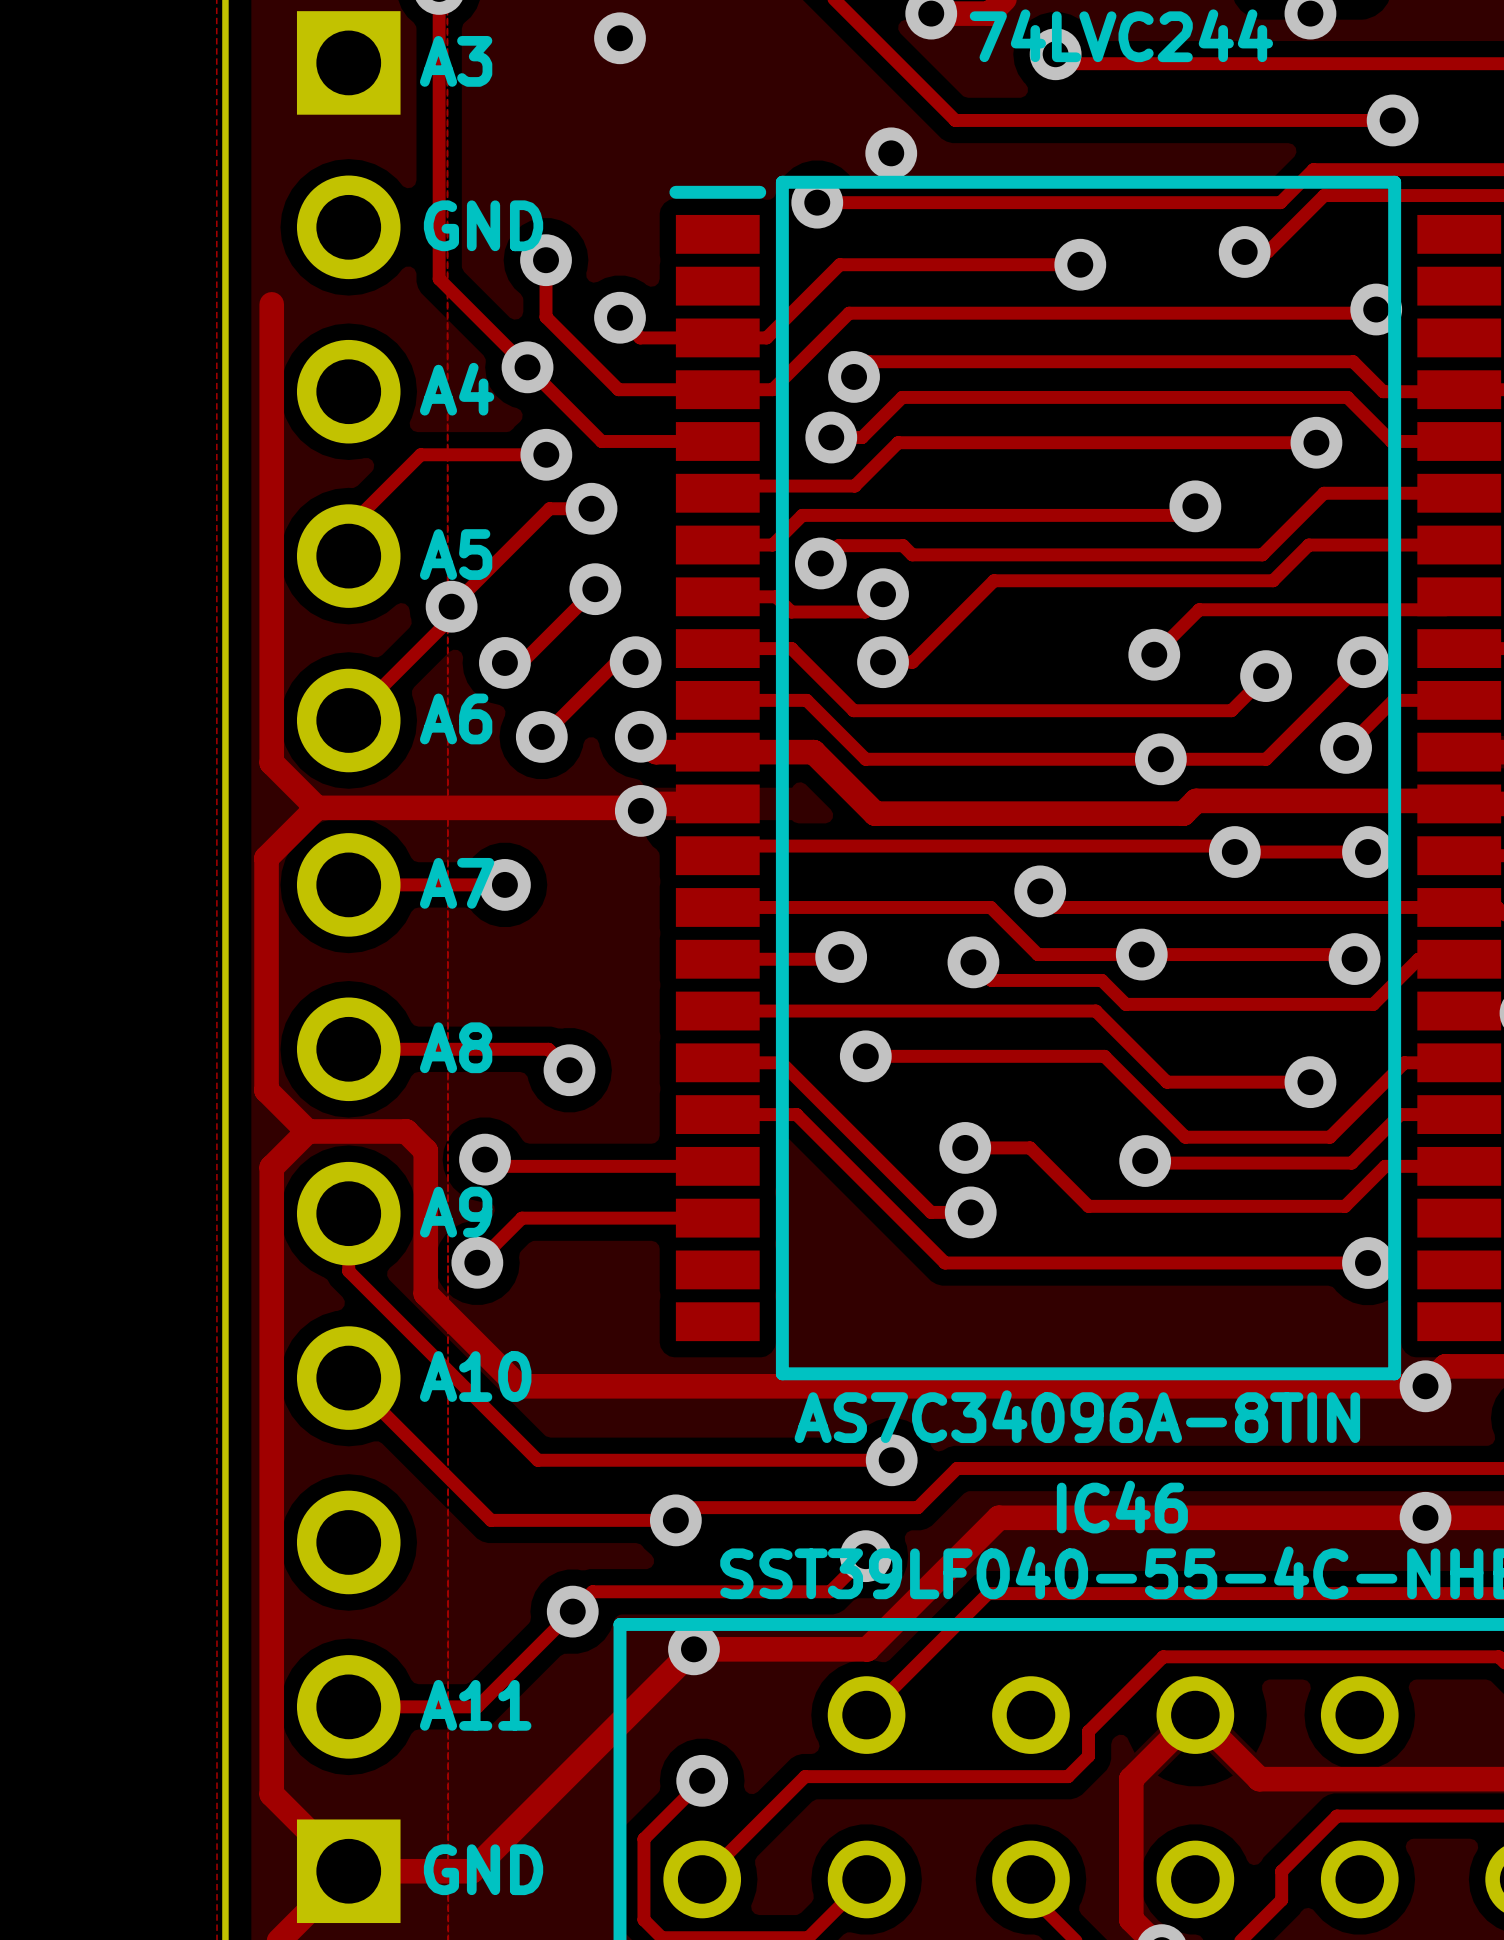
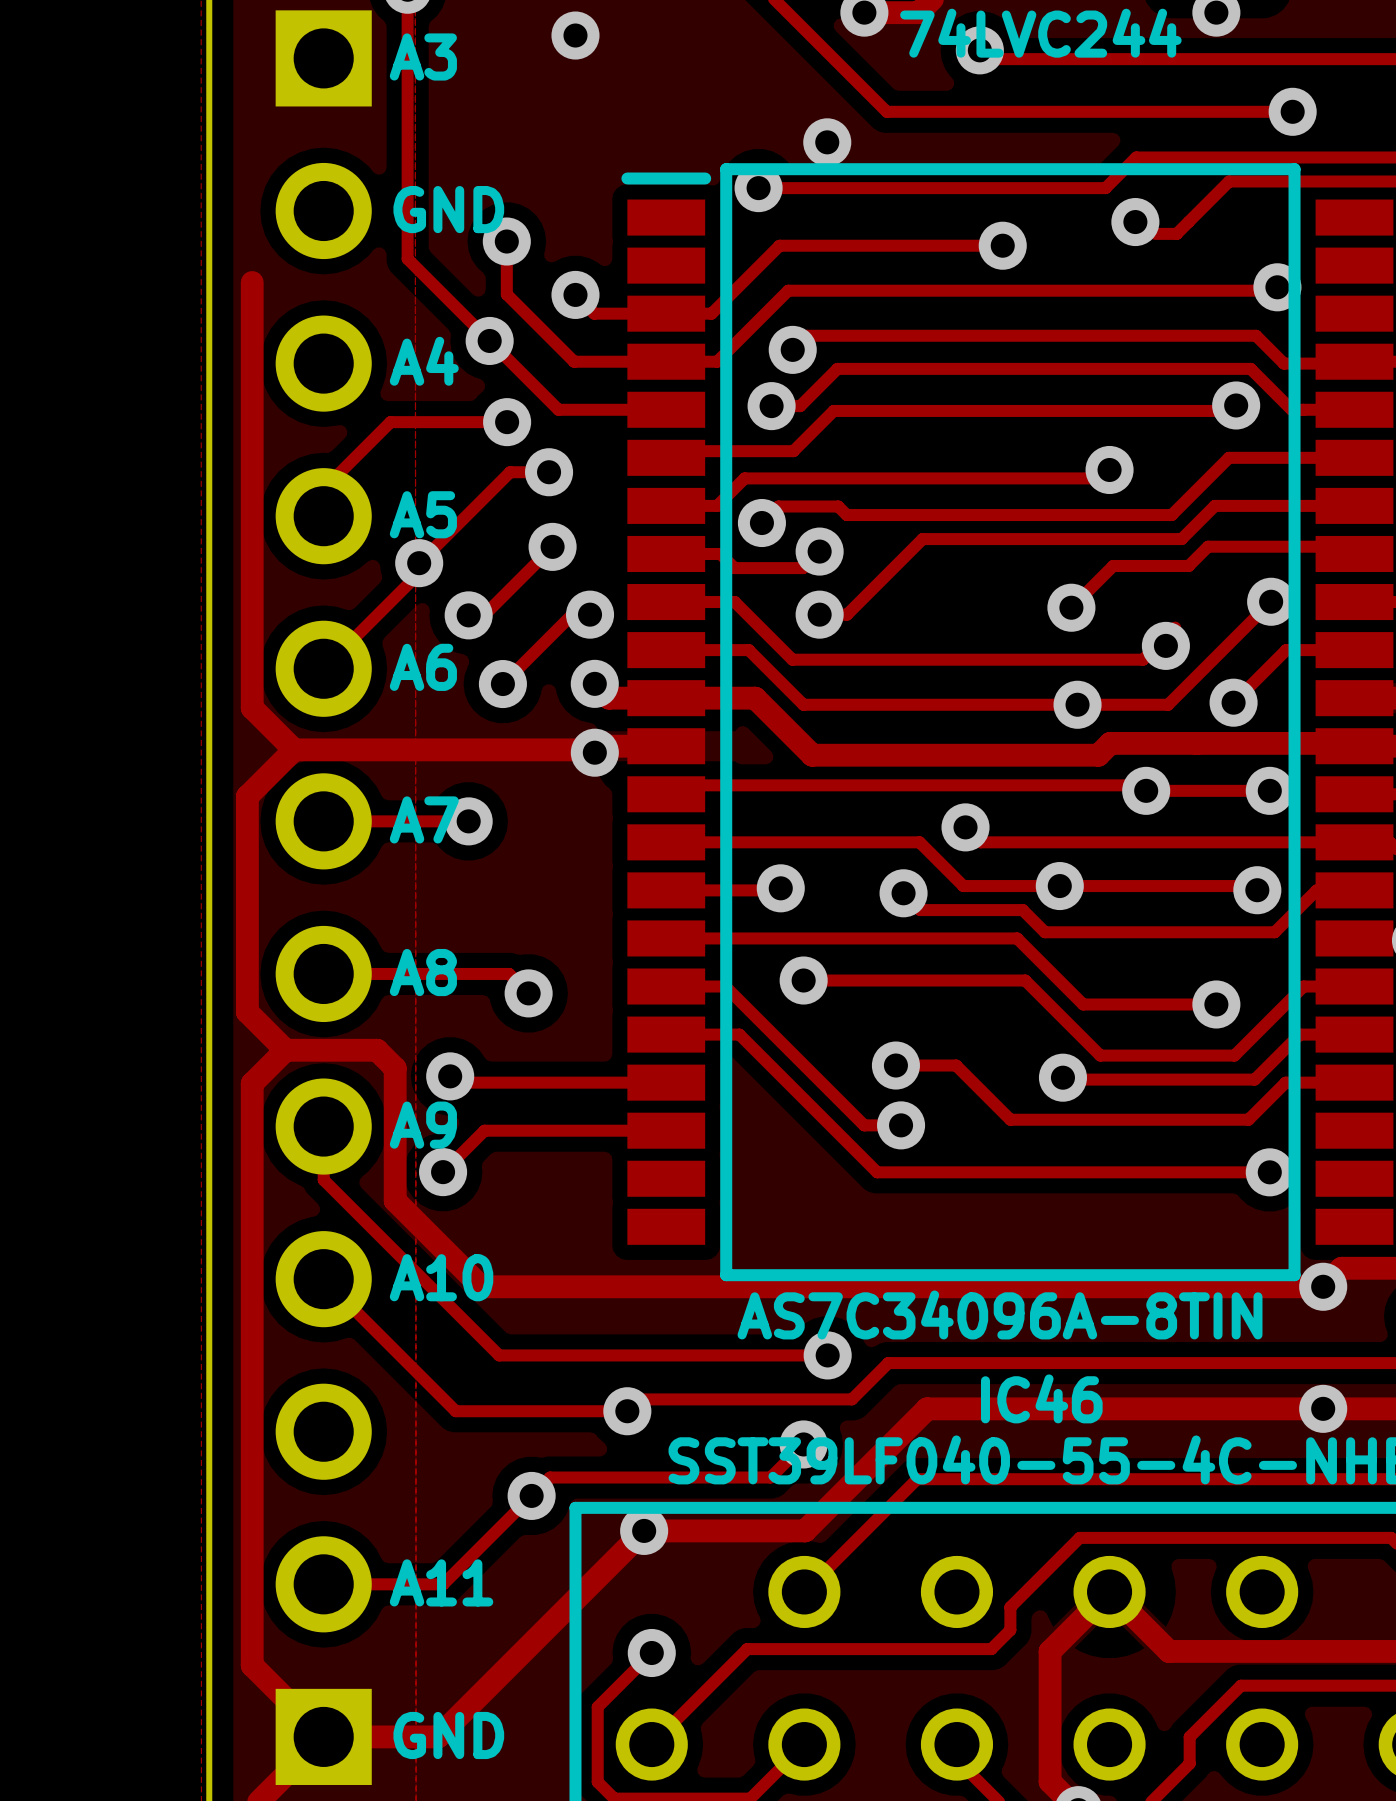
track: (1313, 169) (1280, 202) (1191, 202) -> (1219, 157) (1136, 157) (1105, 188)
via position: (1244, 251) -> (1135, 222)
via position: (1316, 442) -> (1236, 405)
track: (1280, 609) (1446, 609) -> (1188, 565) (1208, 546) (1323, 546)
track: (1363, 662) (1266, 759) (1258, 759) -> (1271, 601) (1168, 704)
via position: (1363, 662) -> (1271, 601)
via position: (1266, 676) -> (1165, 645)
track: (1393, 700) (1346, 747) -> (1293, 650) (1286, 650) (1233, 702)
via position: (1346, 747) -> (1233, 702)

